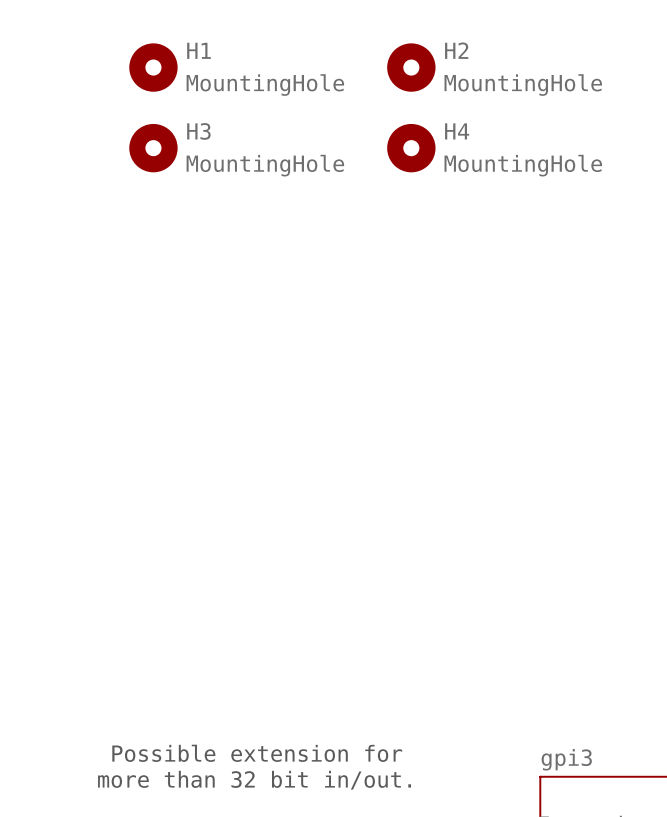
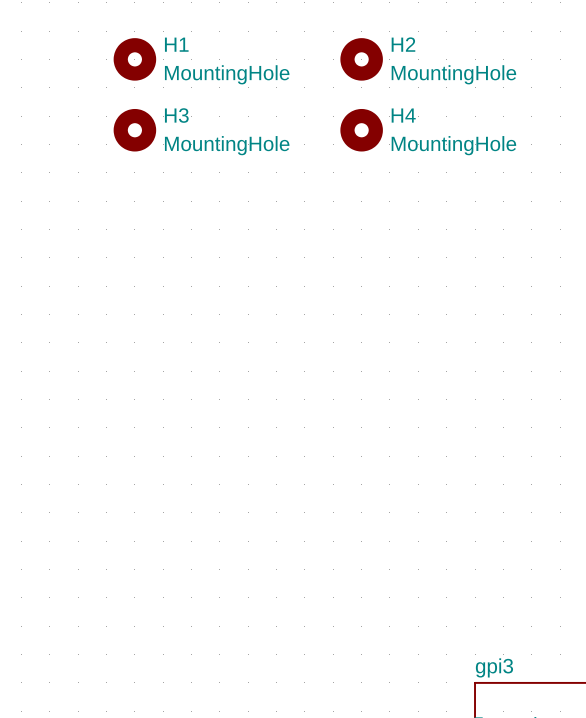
text: Possible extension for (257, 753) -> none
text: more than 32 bit in/out. (254, 780) -> none

